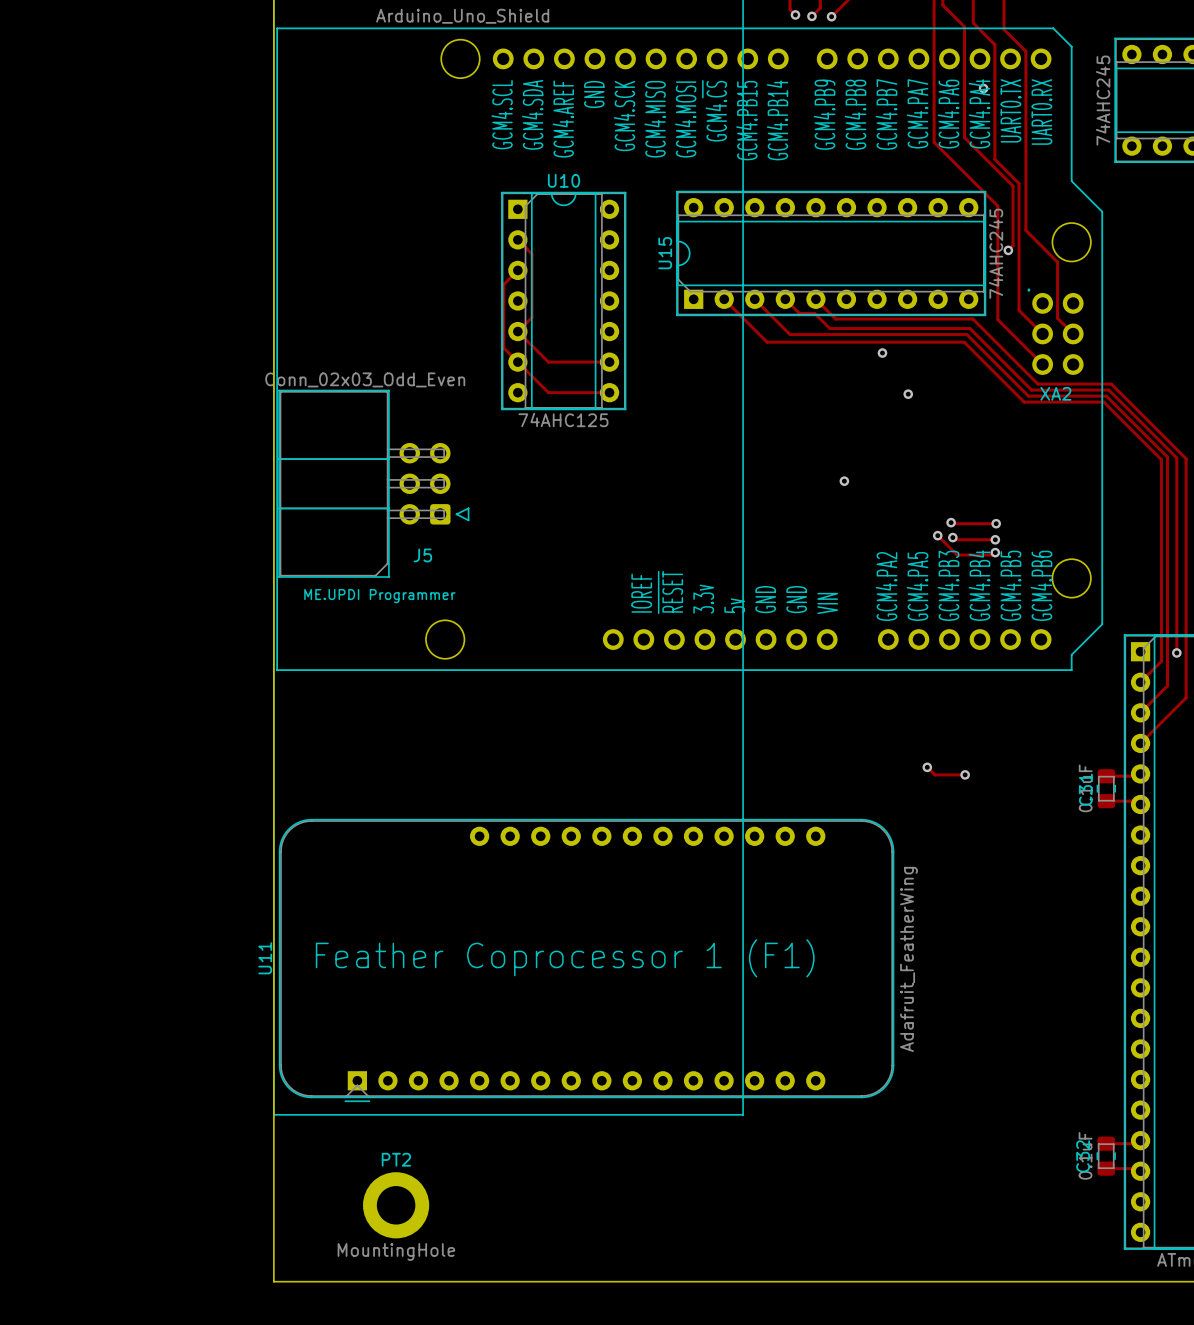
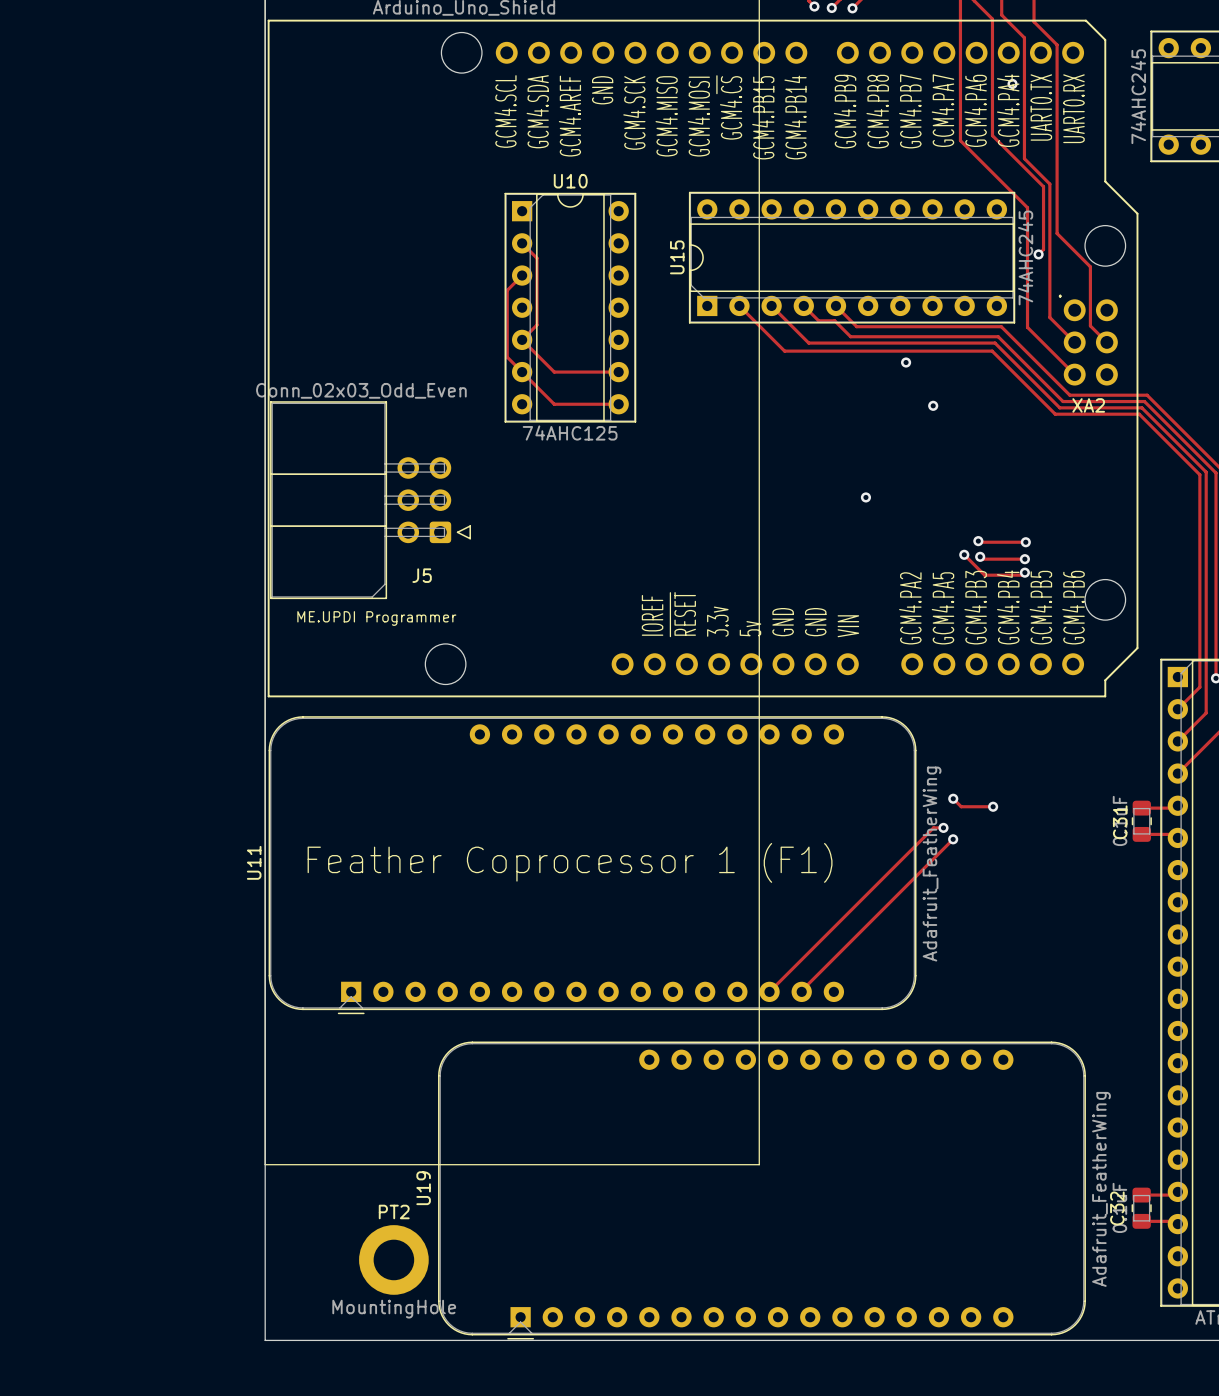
track: none -> (943, 827) (933, 827) (769, 991)
via: none -> (943, 827)
track: none -> (953, 839) (801, 991)
via: none -> (953, 839)
text position: Feather Coprocessor 1 (F1) (565, 958) -> Feather Coprocessor 1 (F1) (570, 862)
U11 position: (586, 960) -> (592, 865)
U19: none -> Adafruit_FeatherWing (761, 1190)

